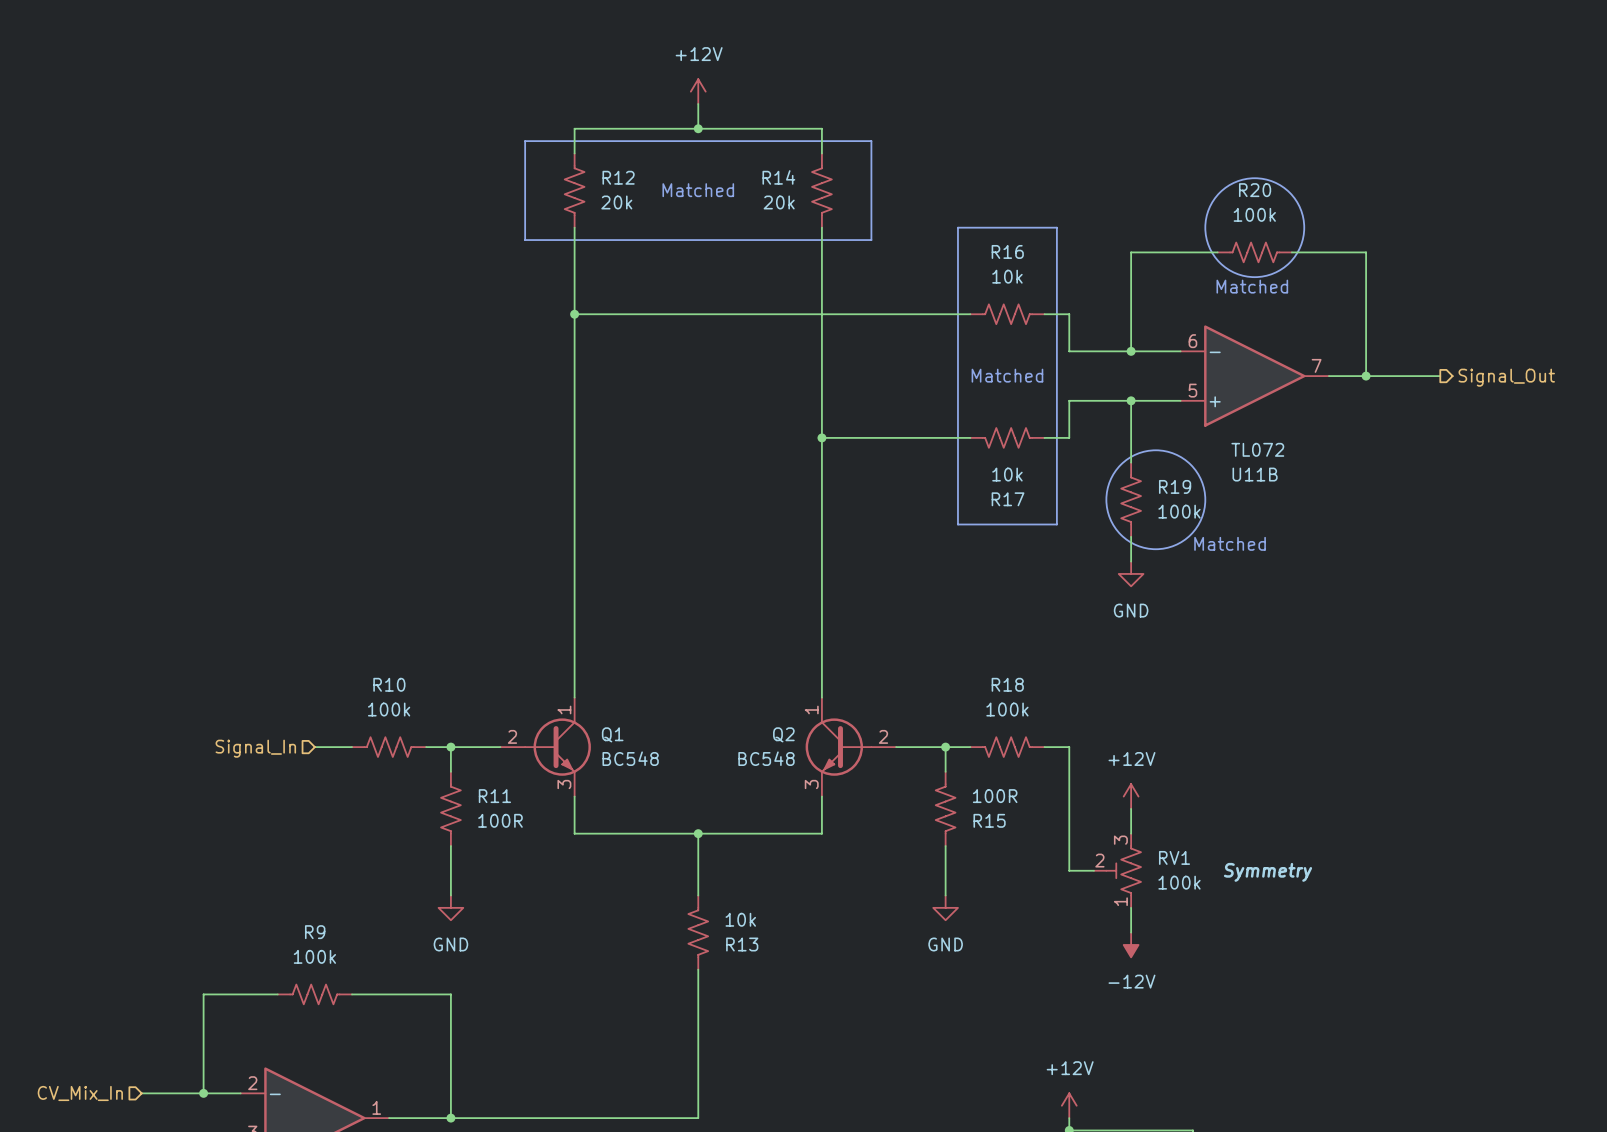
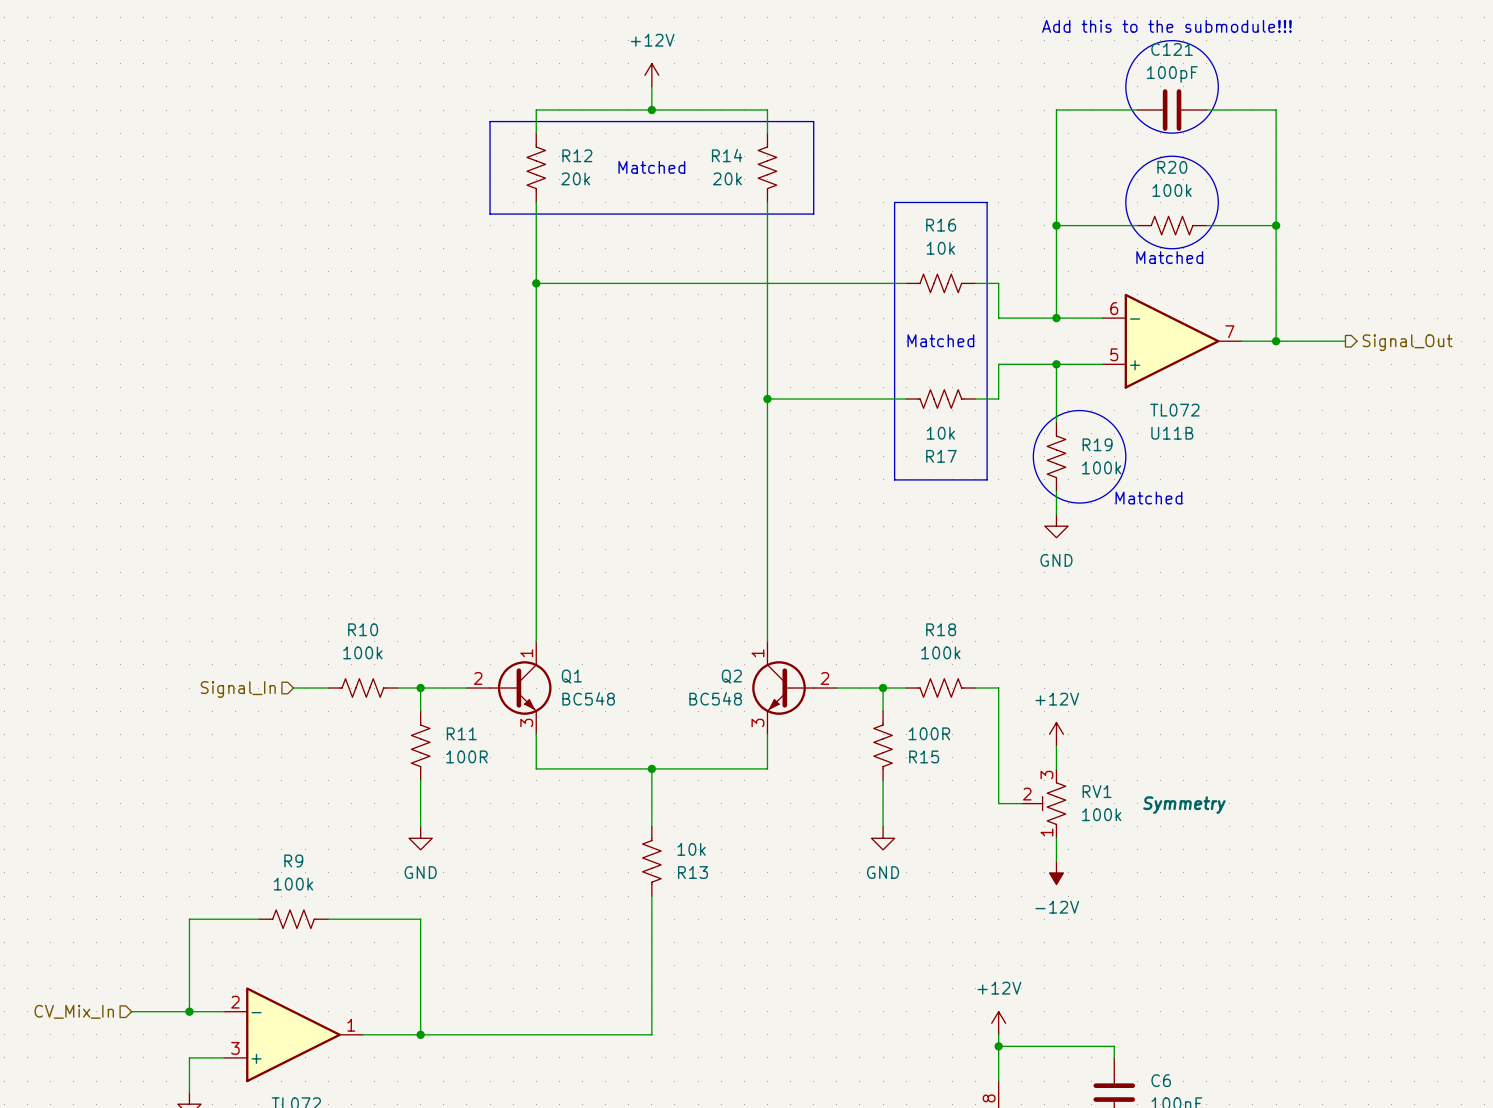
text: none -> Add this to the submodule!!! (1166, 26)
drawing: none -> [1125, 40, 1219, 134]
wire: none -> (1137, 110) (1056, 110) (1056, 225)
C121: none -> 100pF (1172, 110)
wire: none -> (1206, 110) (1276, 110) (1276, 225)
junction: none -> (1056, 225)
junction: none -> (1276, 225)

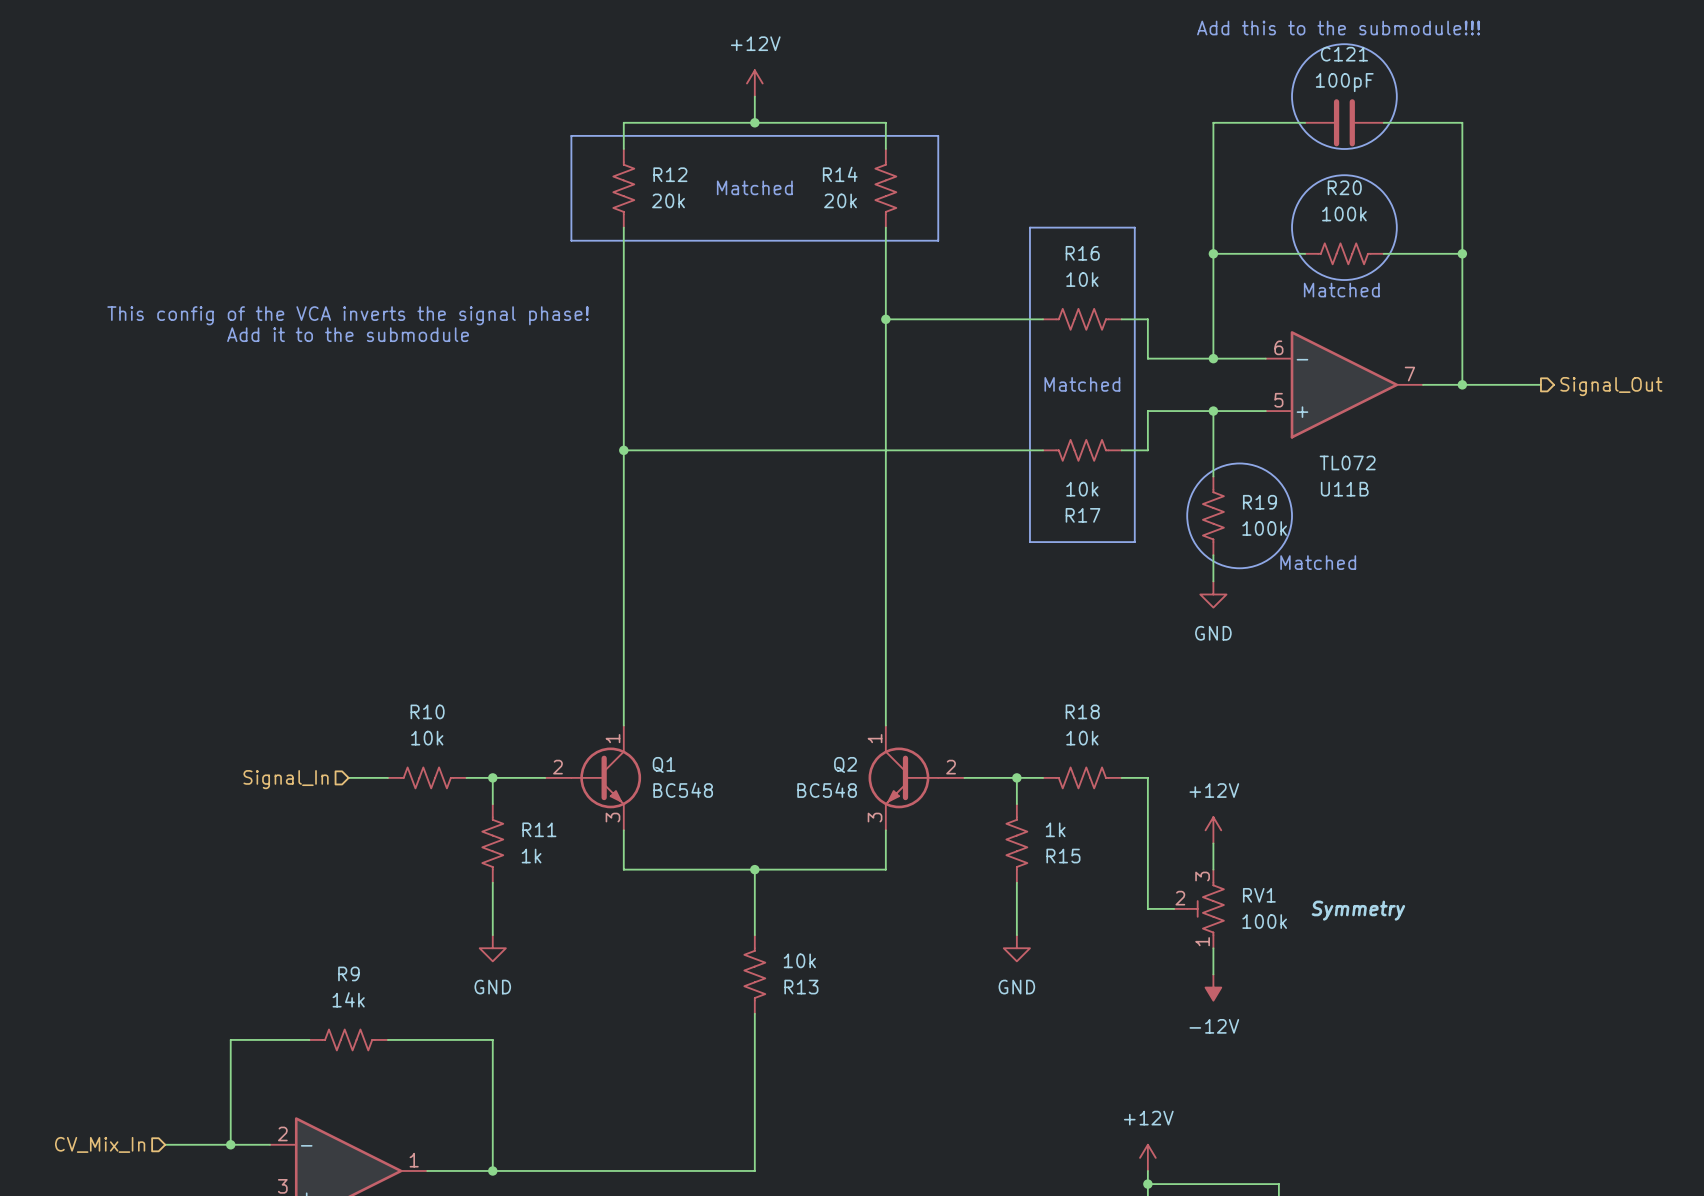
text: none -> This config of the VCA inverts the signal phase! (348, 315)
wire: (536, 283) (767, 283) -> (623, 450) (885, 450)
junction: (536, 283) -> none
junction: none -> (885, 319)
text: none -> Add it to the submodule (348, 334)
junction: none -> (623, 450)
junction: (767, 399) -> none
R10 value: 100k (362, 652) -> 10k (427, 738)
R18 value: 100k (940, 652) -> 10k (1082, 738)
R15 value: 100R (929, 733) -> 1k (1055, 829)
R11 value: 100R (466, 756) -> 1k (531, 856)
R9 value: 100k (293, 884) -> 14k (348, 999)

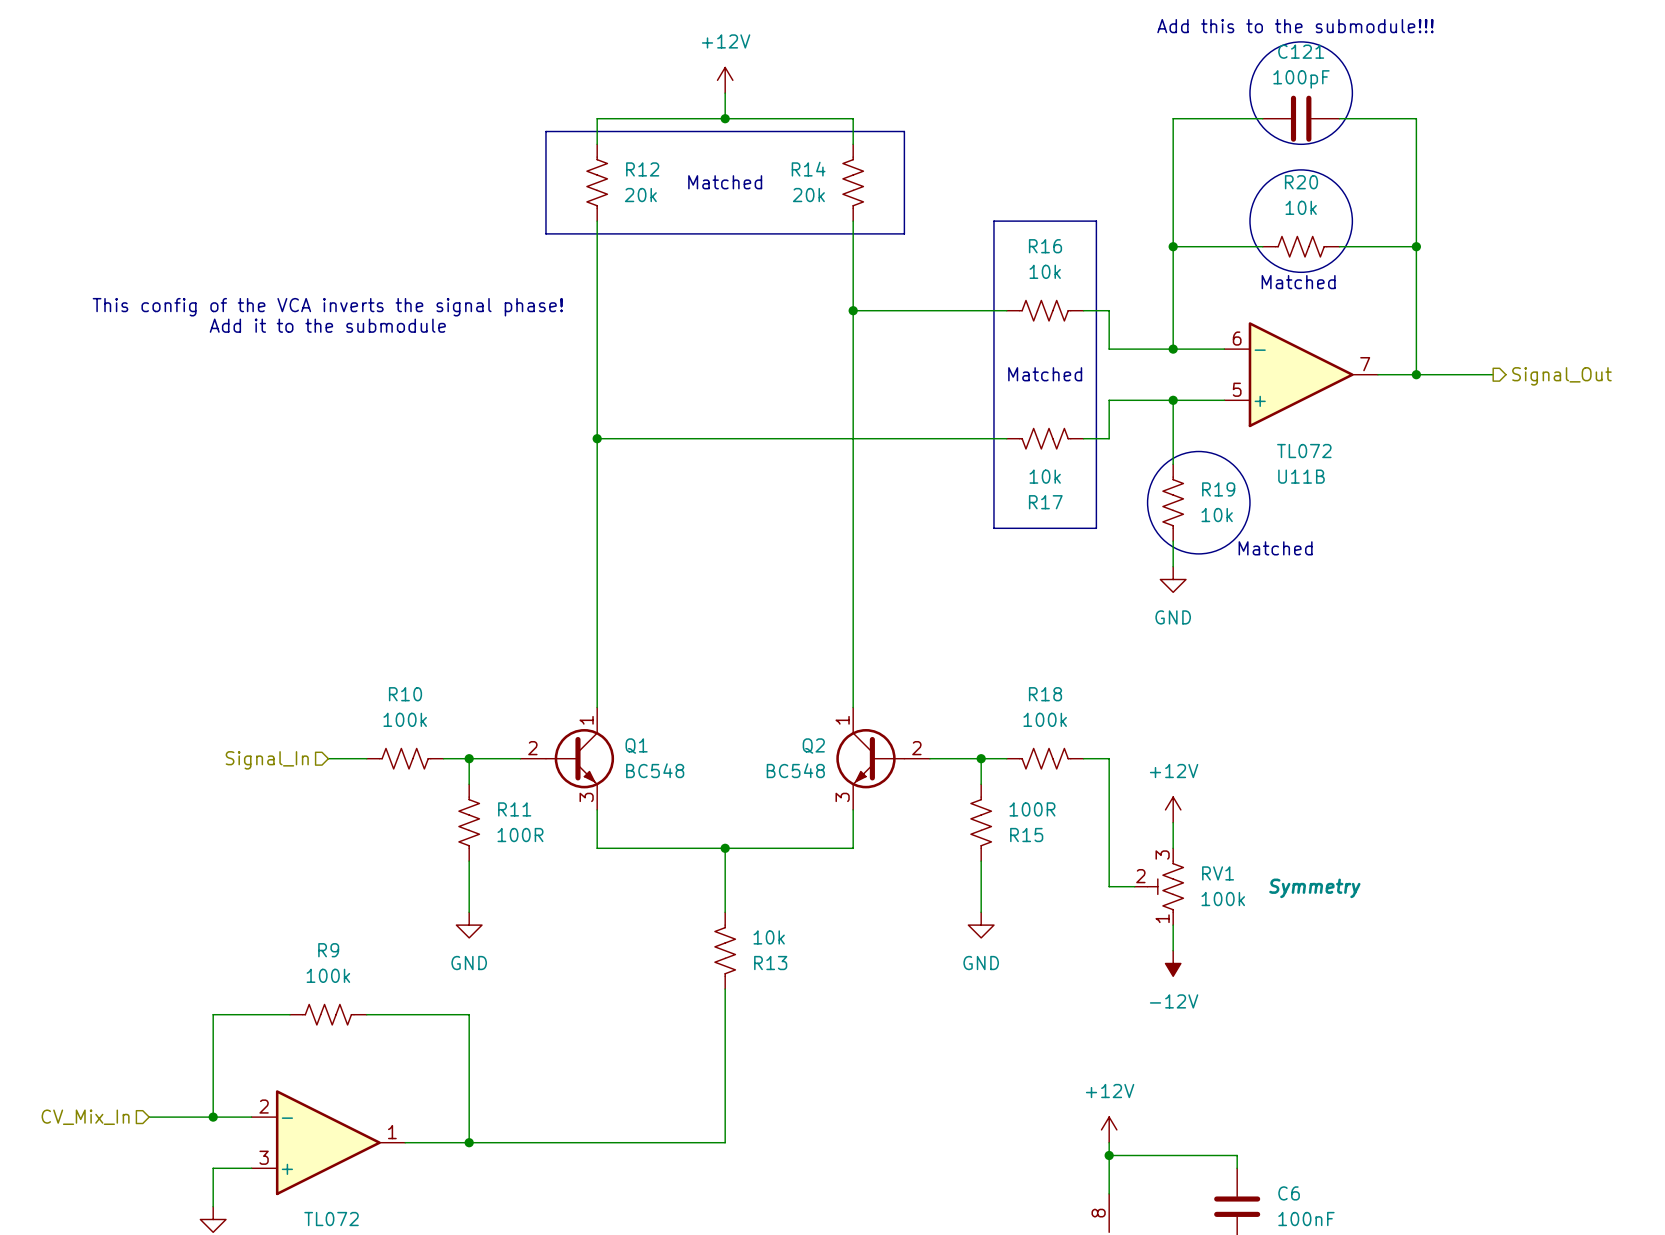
R20 value: 100k (1344, 214) -> 10k (1301, 207)
R19 value: 100k (1264, 528) -> 10k (1217, 515)
R10 value: 10k (427, 738) -> 100k (405, 719)
R18 value: 10k (1082, 738) -> 100k (1045, 719)
R15 value: 1k (1055, 829) -> 100R (1032, 809)
R11 value: 1k (531, 856) -> 100R (520, 835)
R9 value: 14k (348, 999) -> 100k (328, 975)

